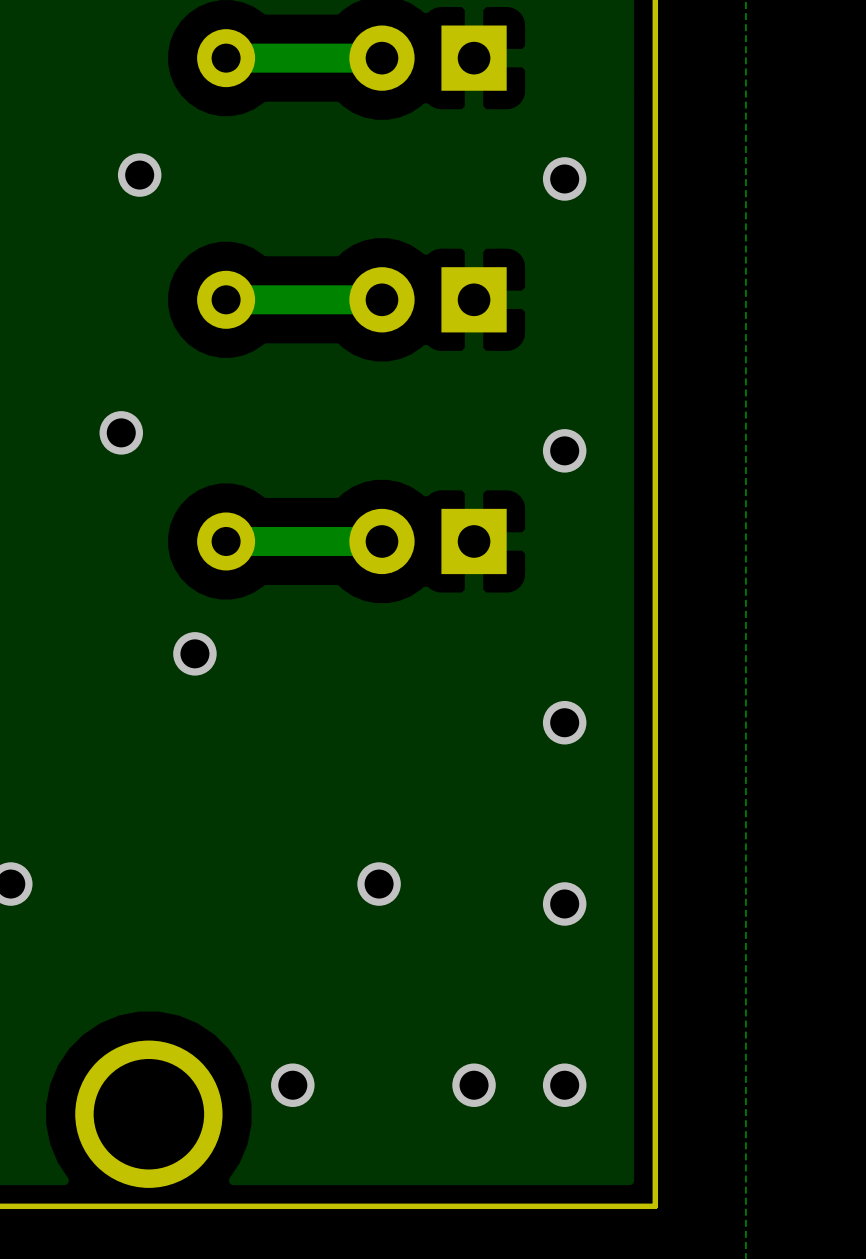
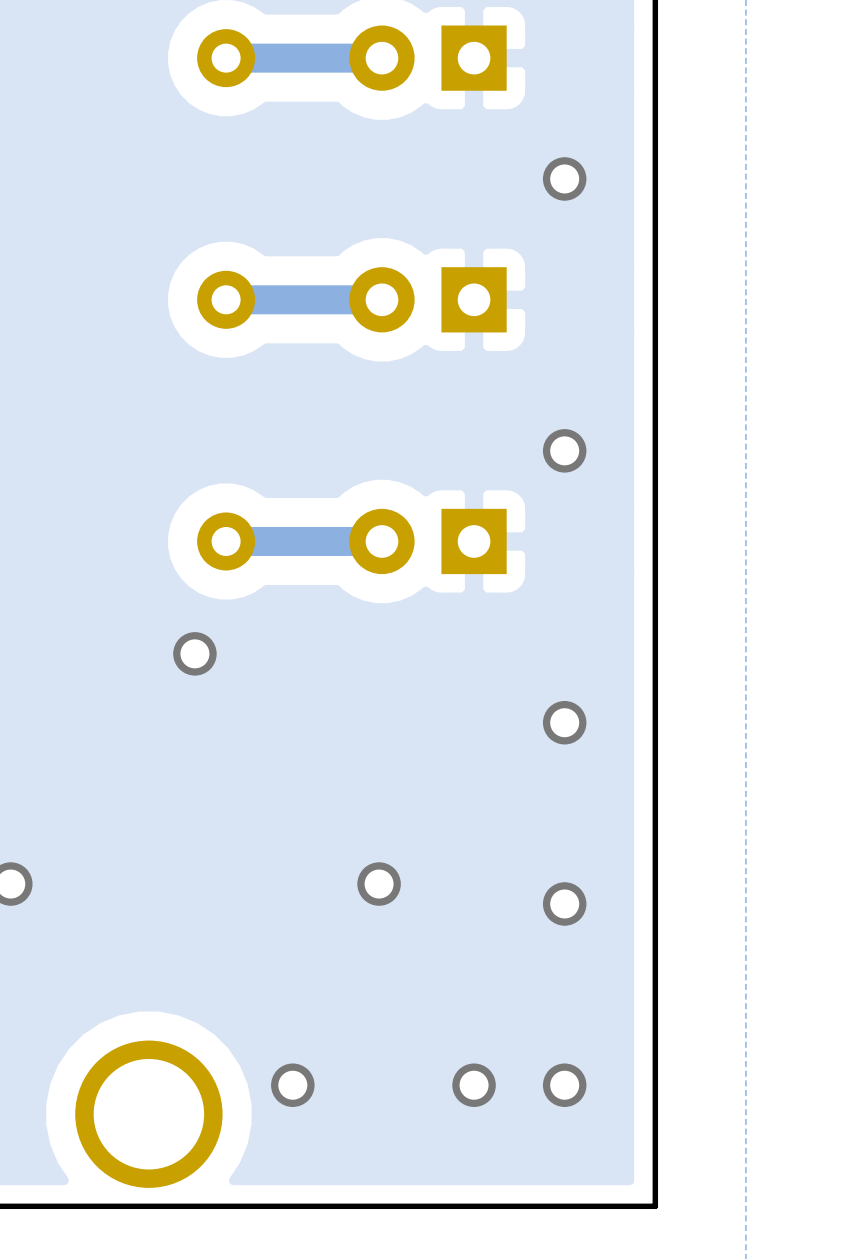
via: (139, 175) -> none
via: (121, 432) -> none

